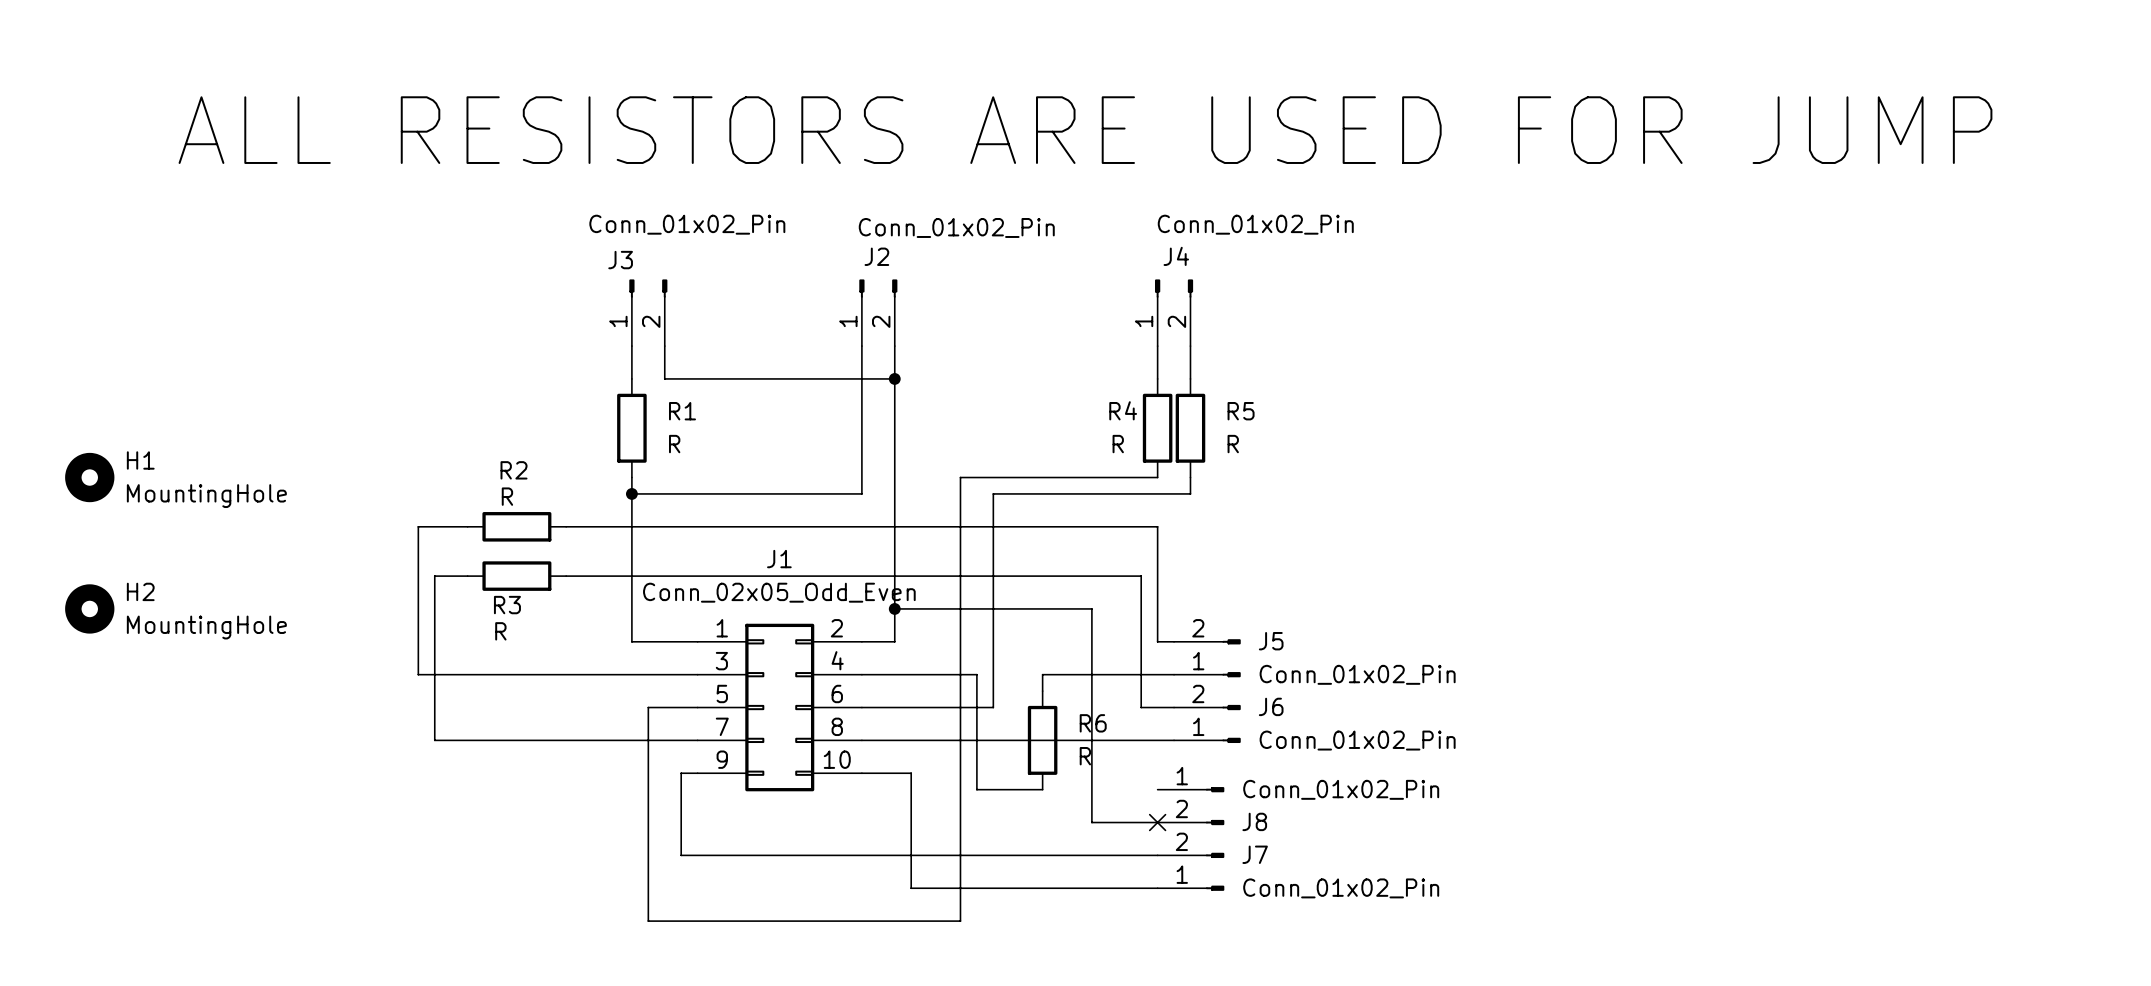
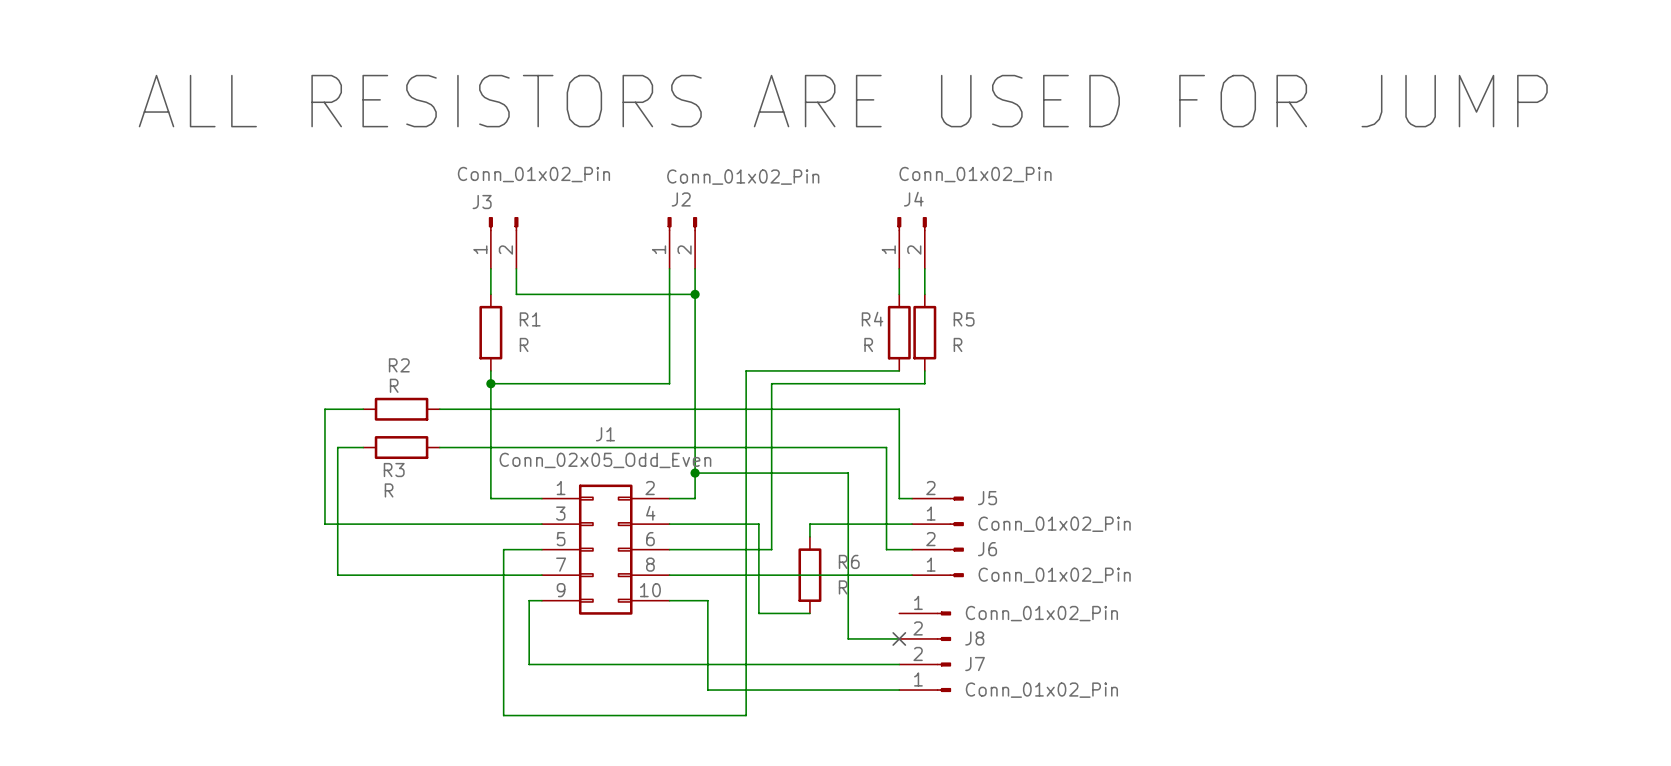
H1: MountingHole (89, 477) -> none
H2: MountingHole (89, 608) -> none

